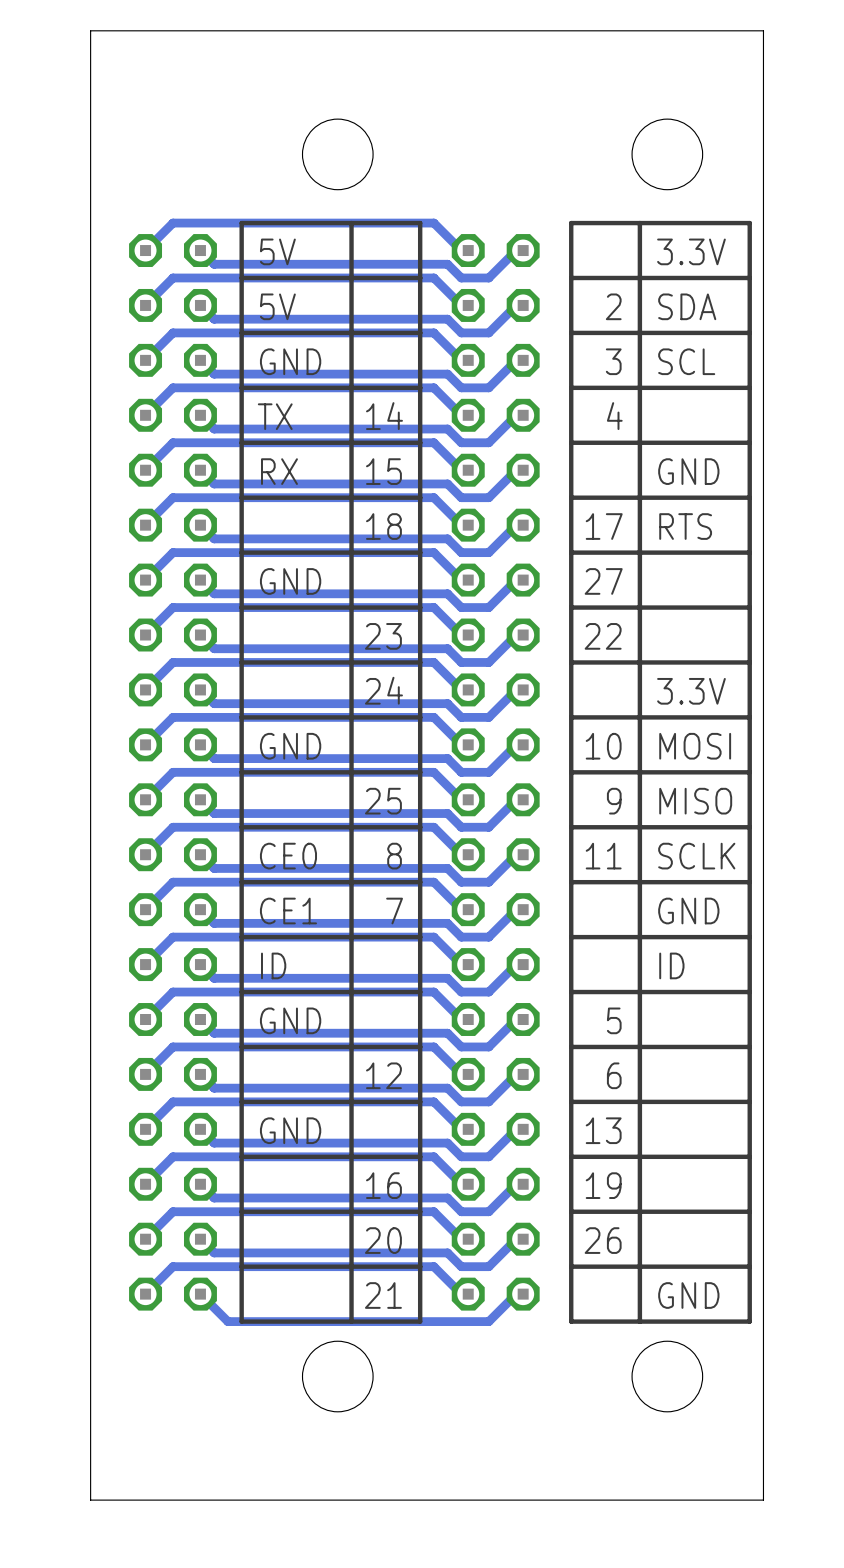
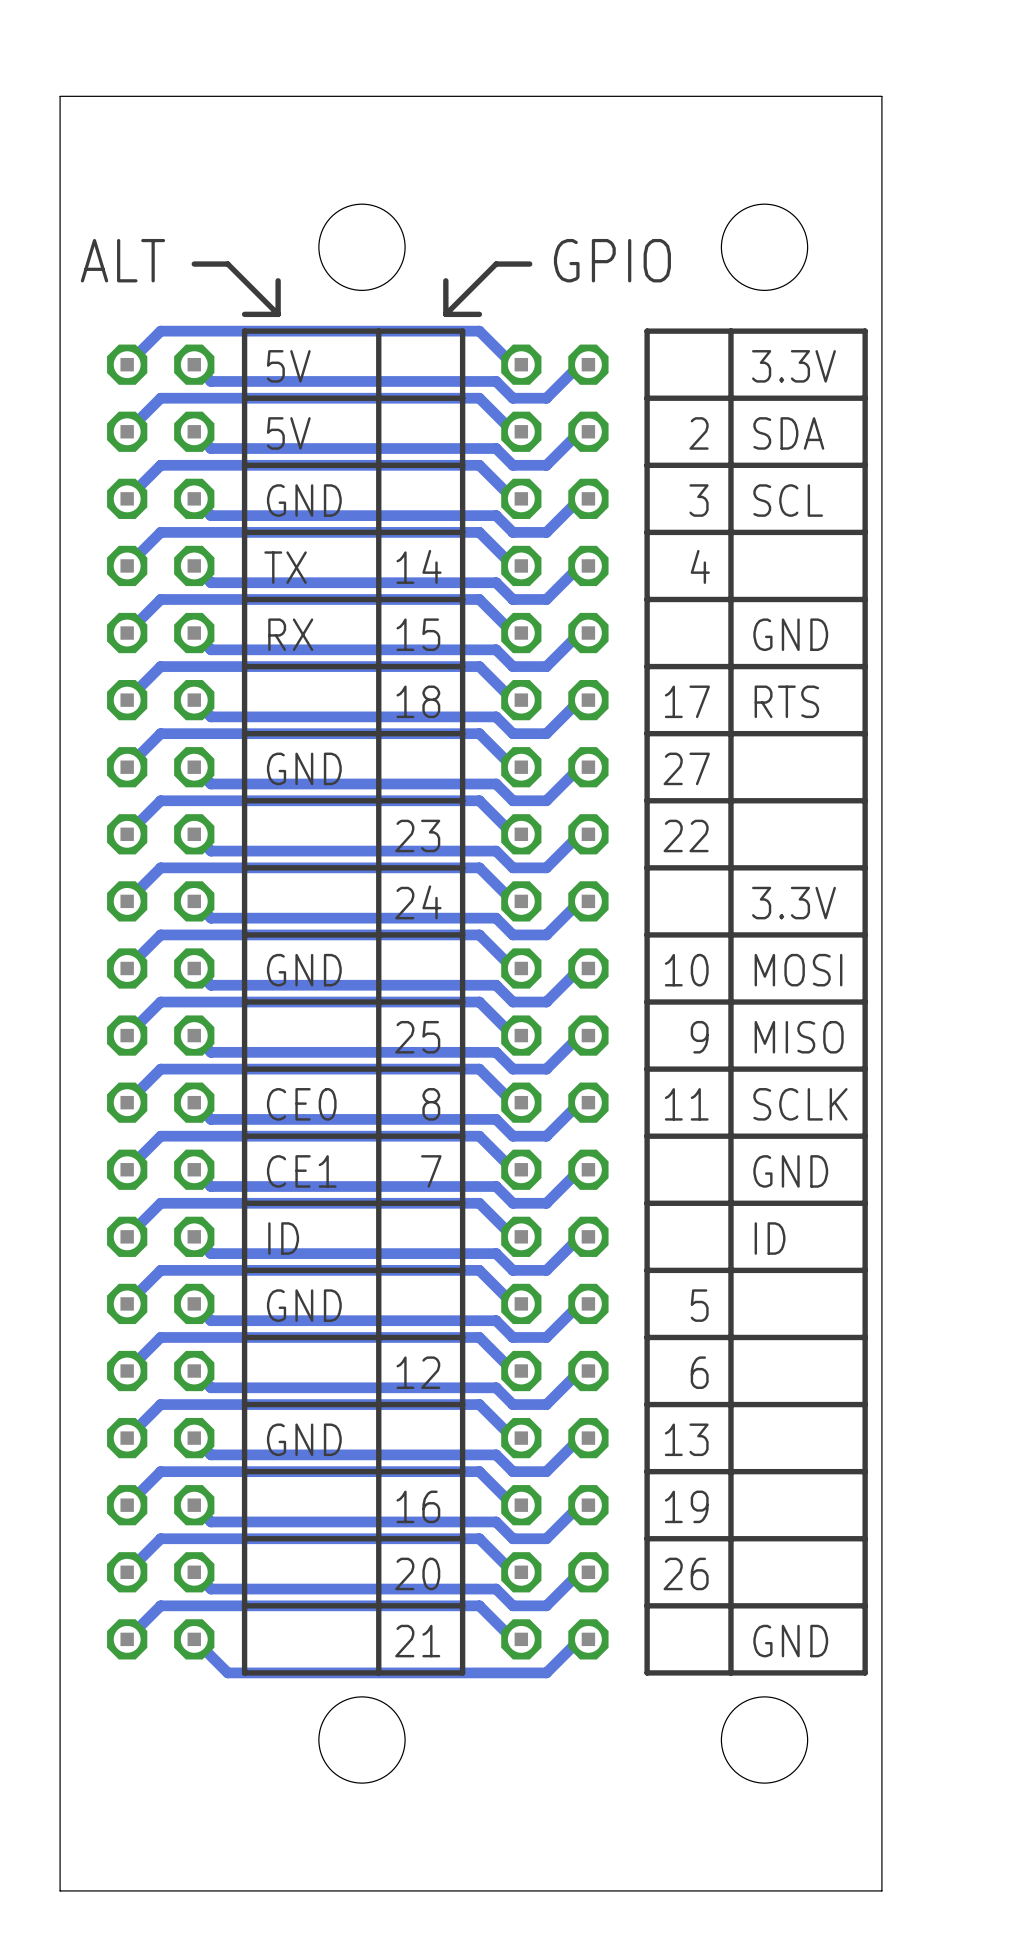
text: none -> ALT (122, 260)
text: none -> GPIO (612, 260)
line: none -> (194, 264) (227, 264) (278, 314)
line: none -> (529, 264) (496, 264) (445, 314)
line: none -> (278, 280) (278, 314)
line: none -> (445, 280) (445, 314)
line: none -> (244, 314) (278, 314)
line: none -> (445, 314) (479, 314)

